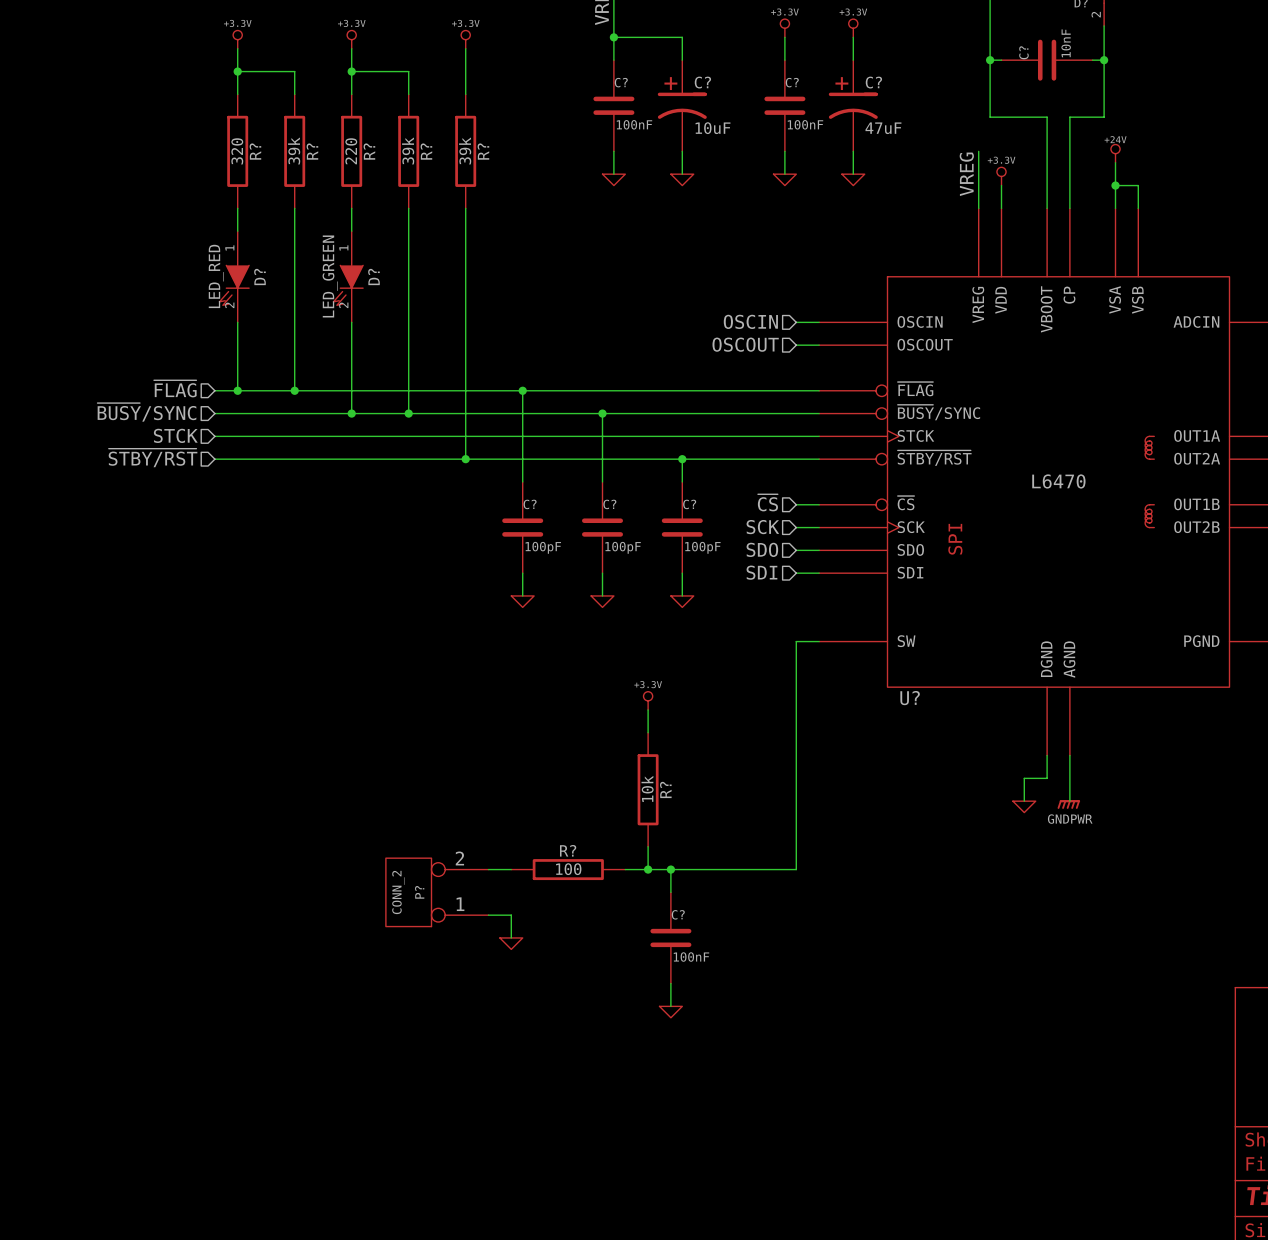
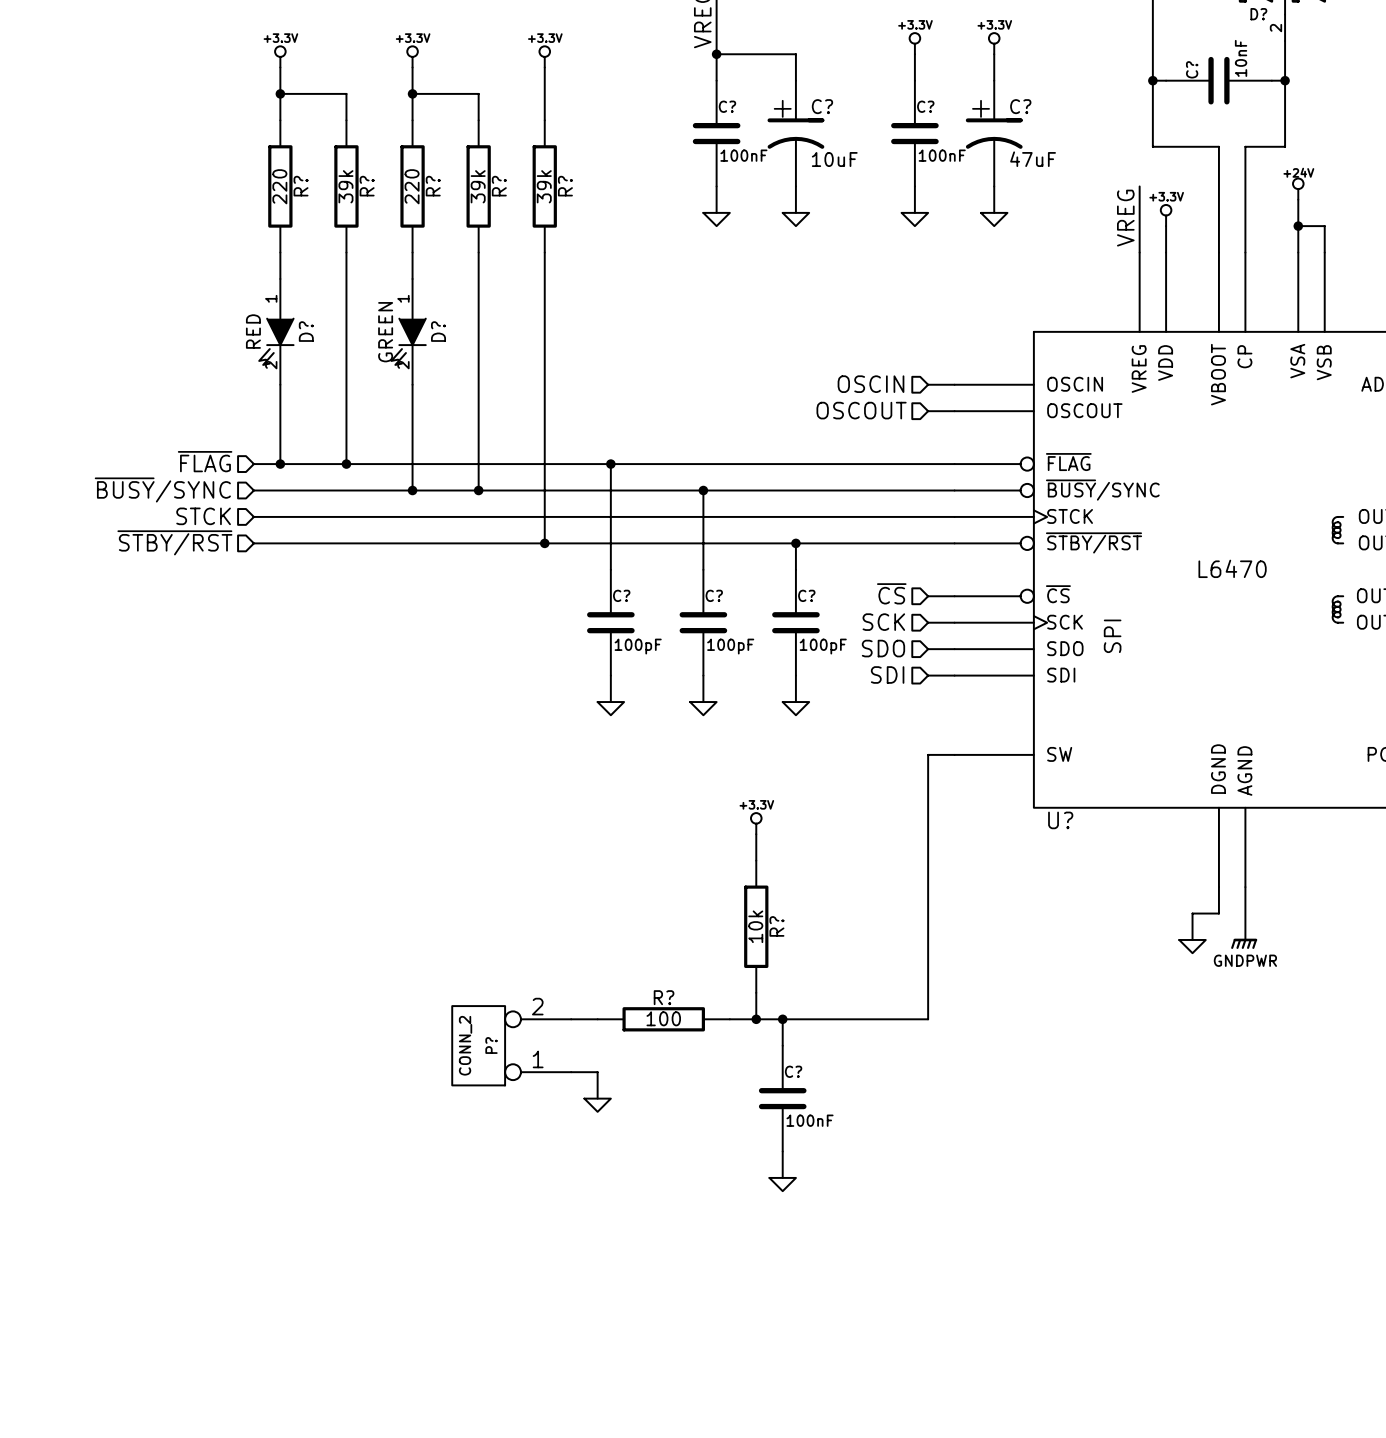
R? value: 320 (237, 151) -> 220 (279, 186)
D? value: LED_RED (216, 276) -> RED (253, 331)
D? value: LED_GREEN (330, 276) -> GREEN (385, 332)

